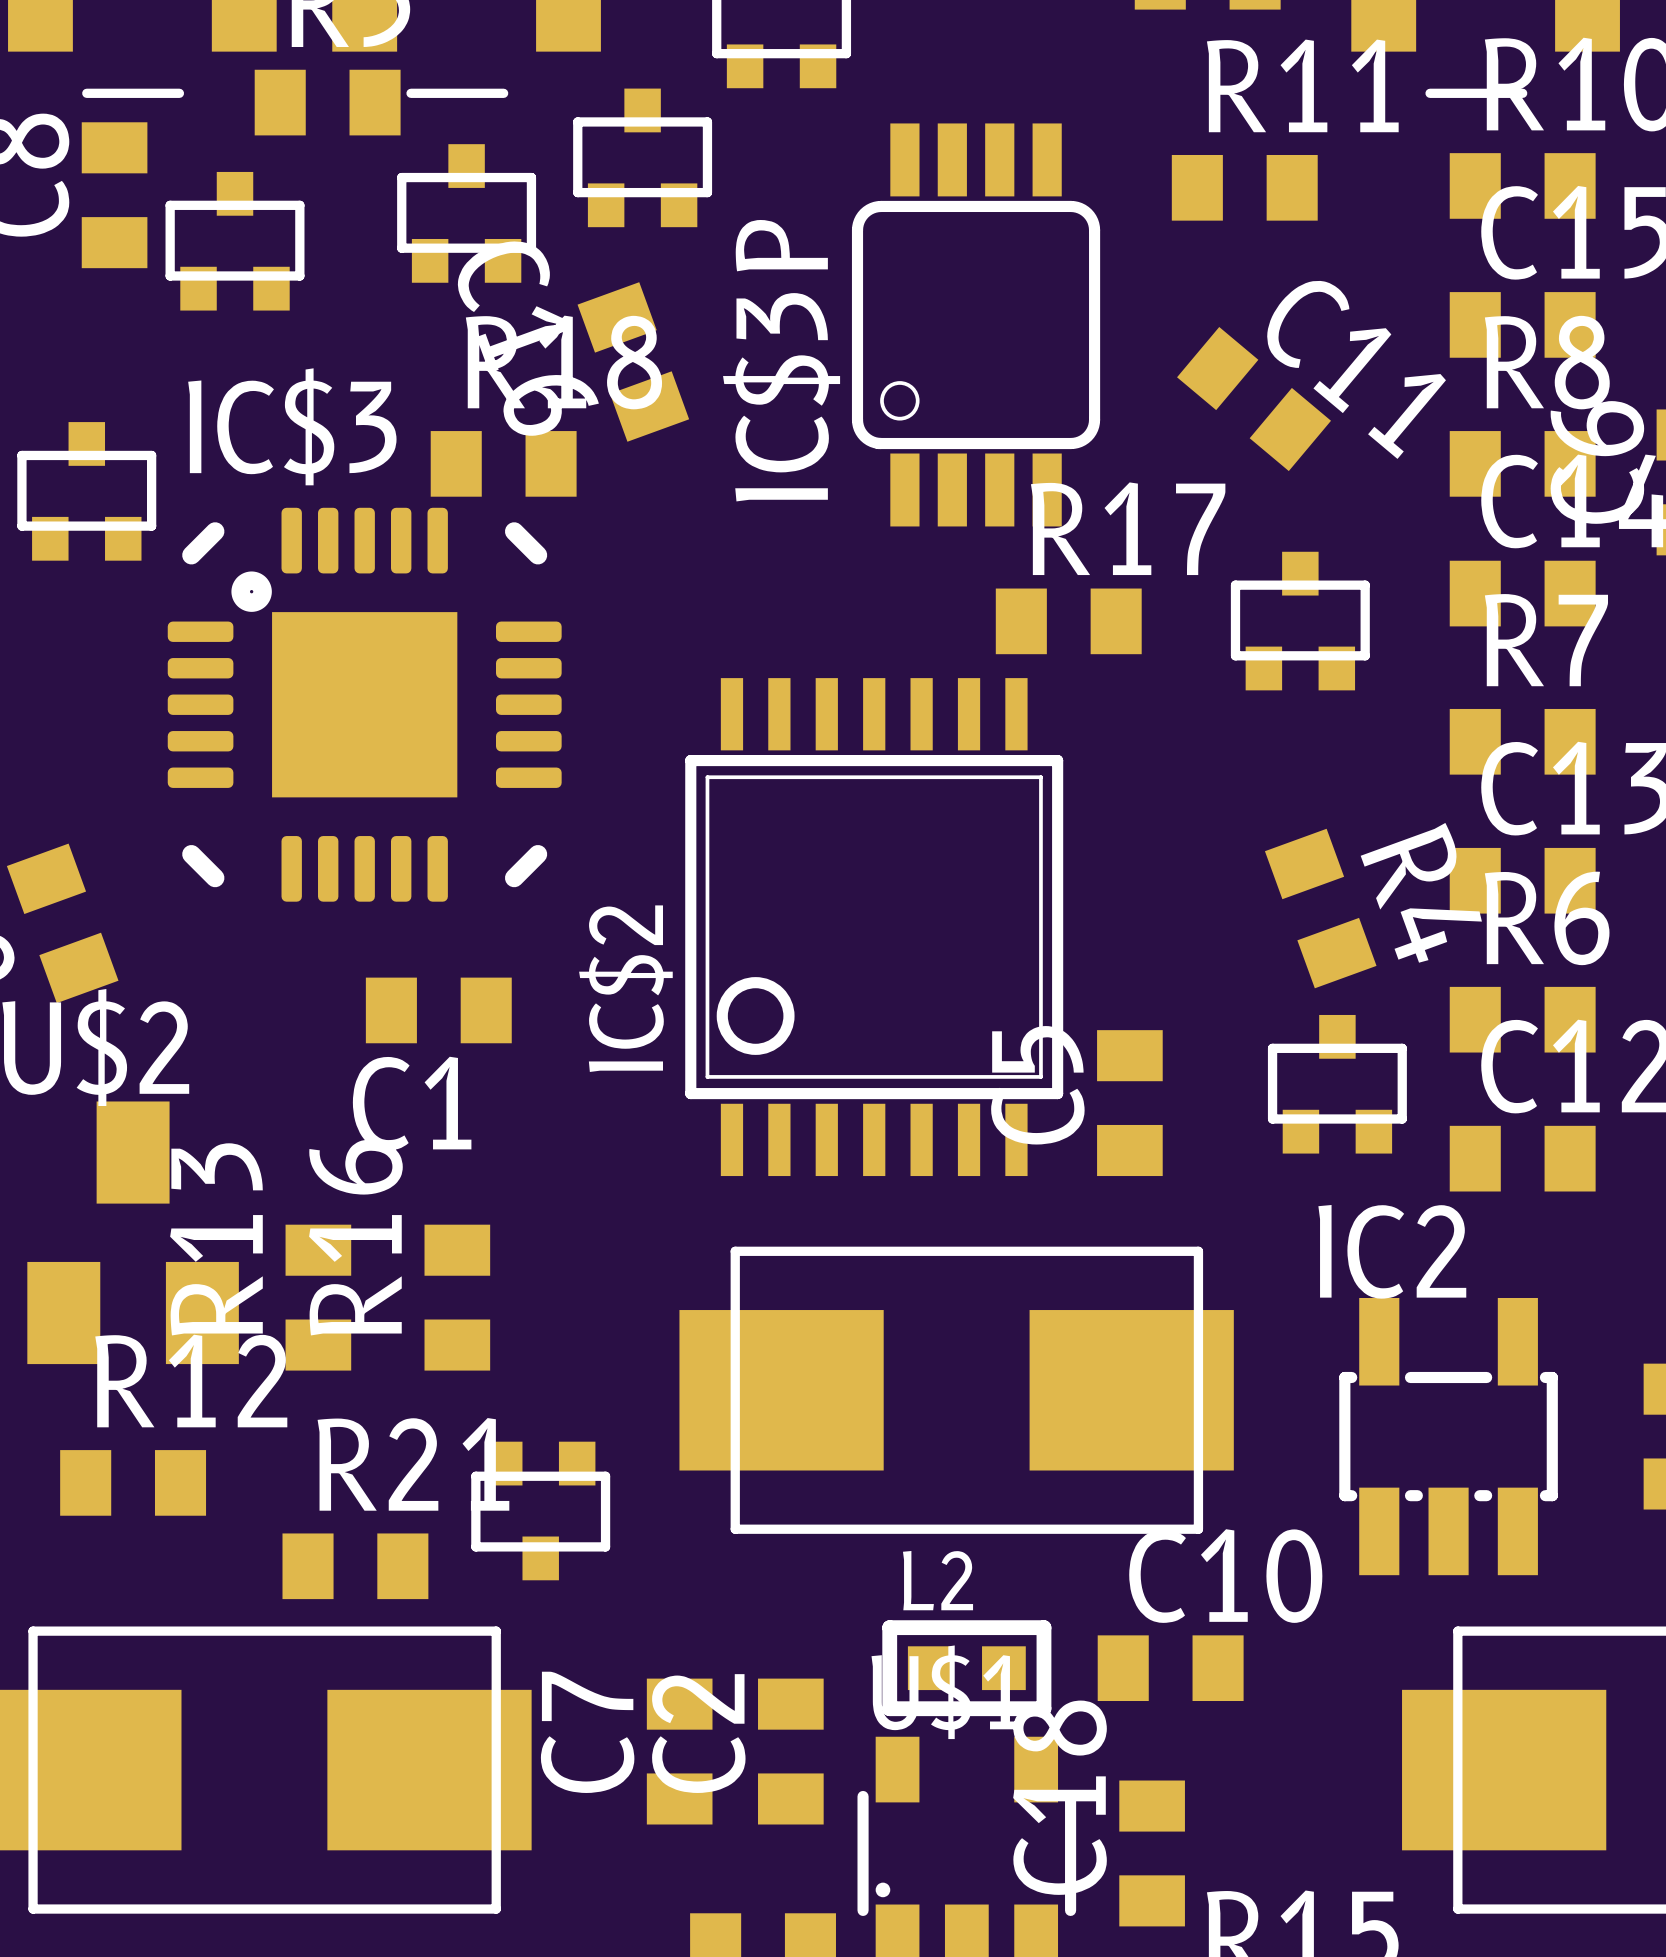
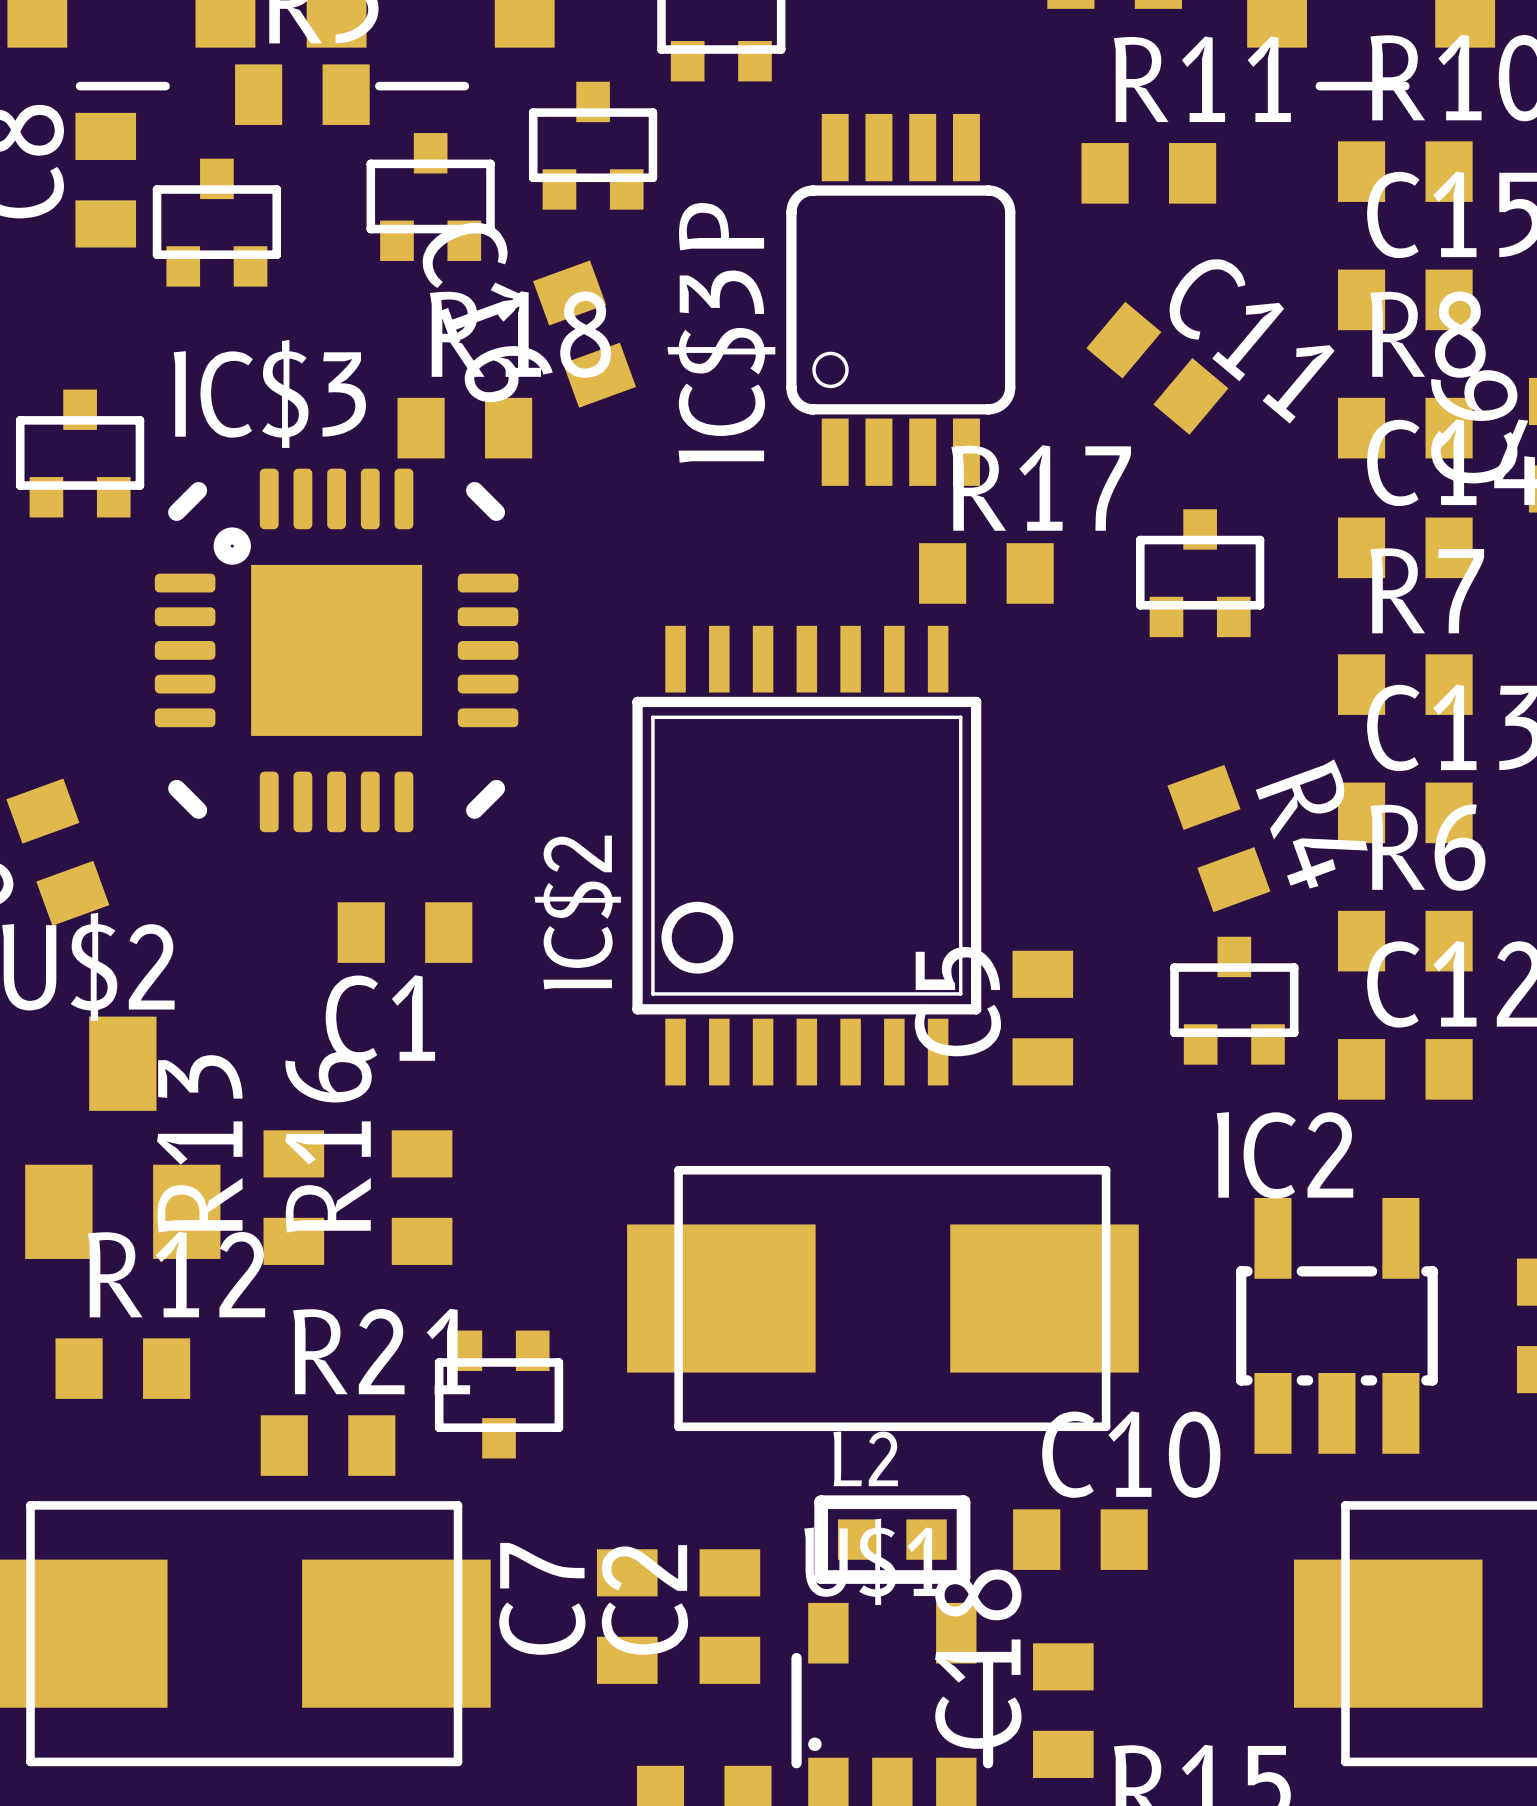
part position: (956, 1390) -> (882, 1298)

